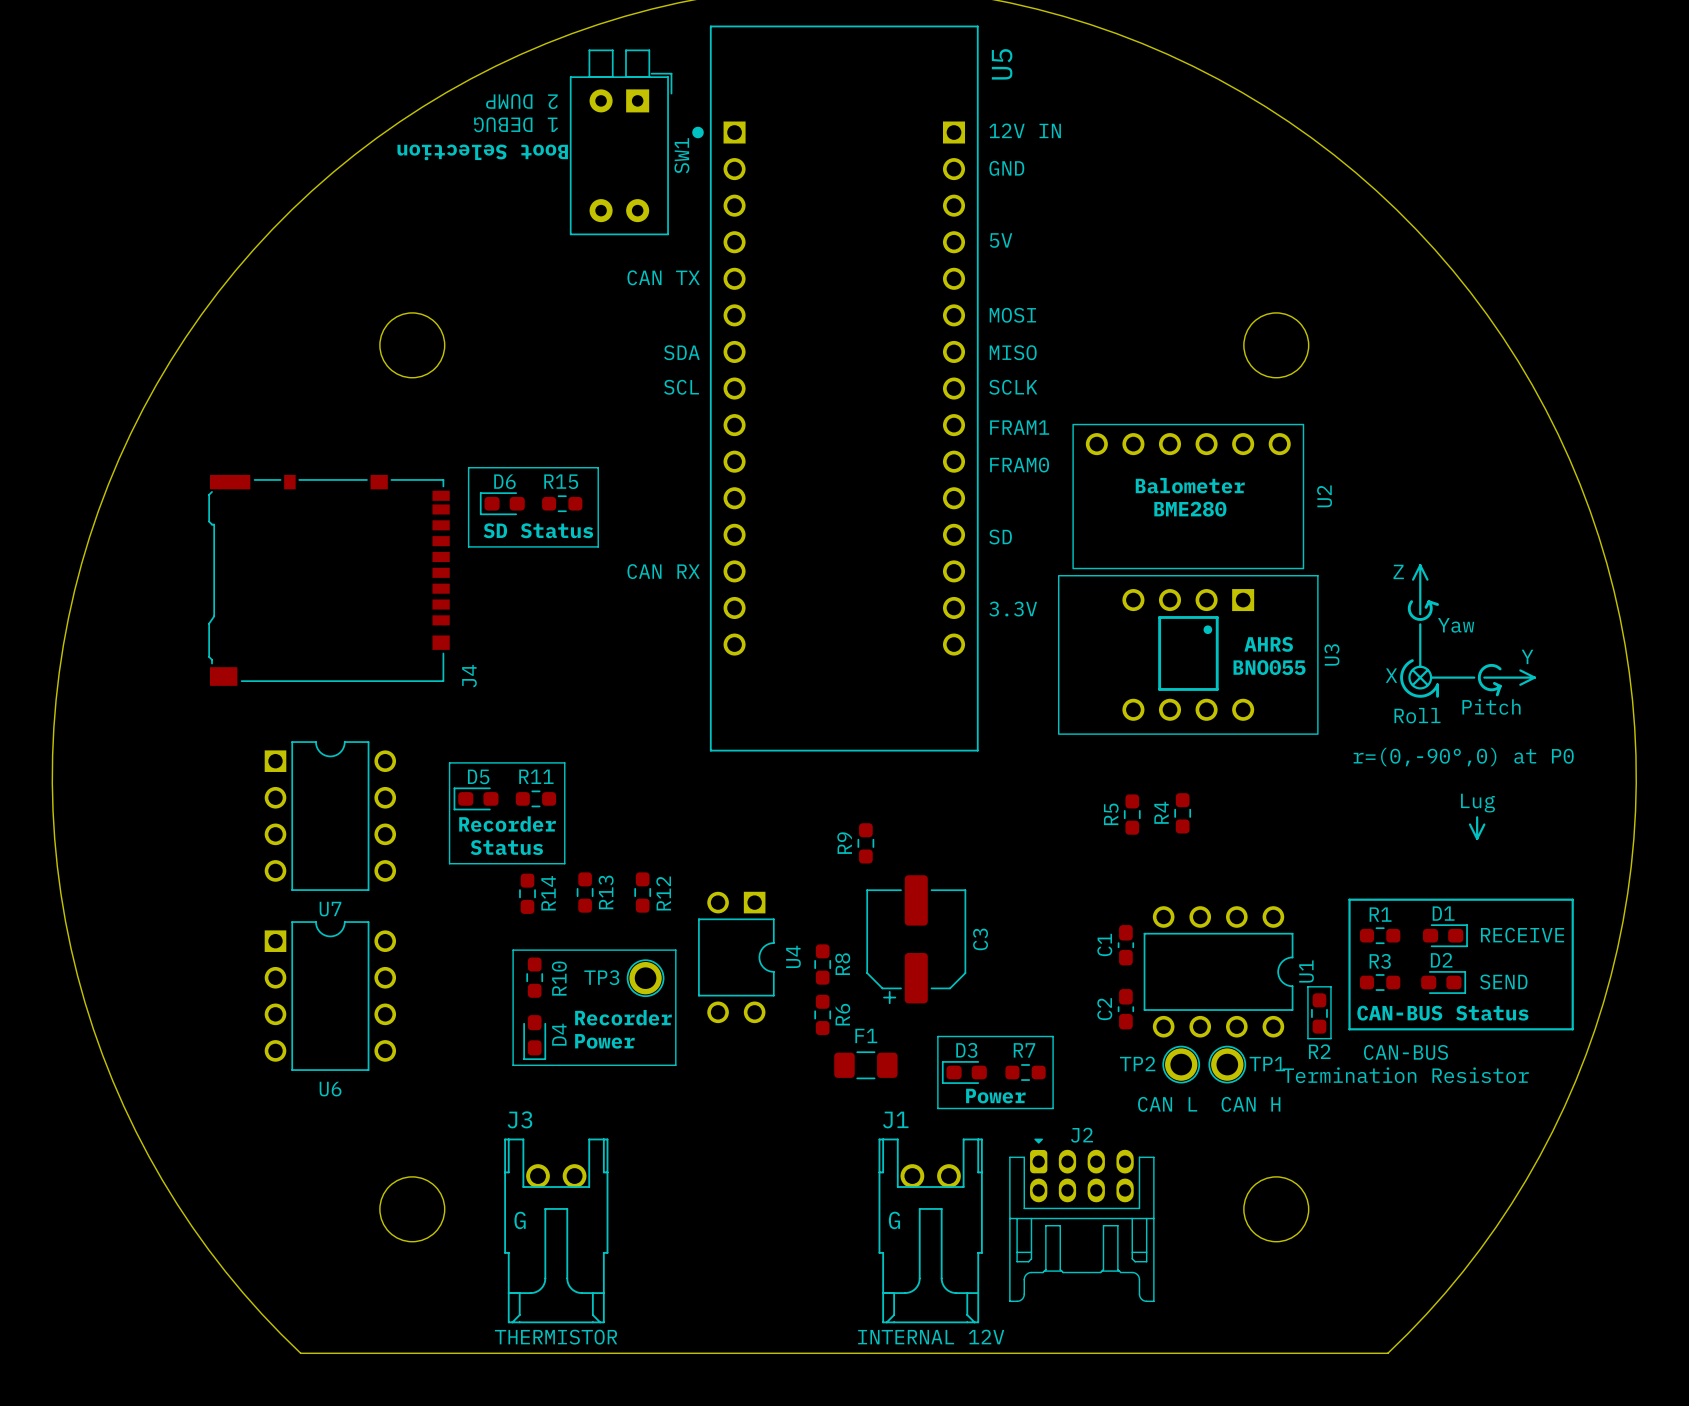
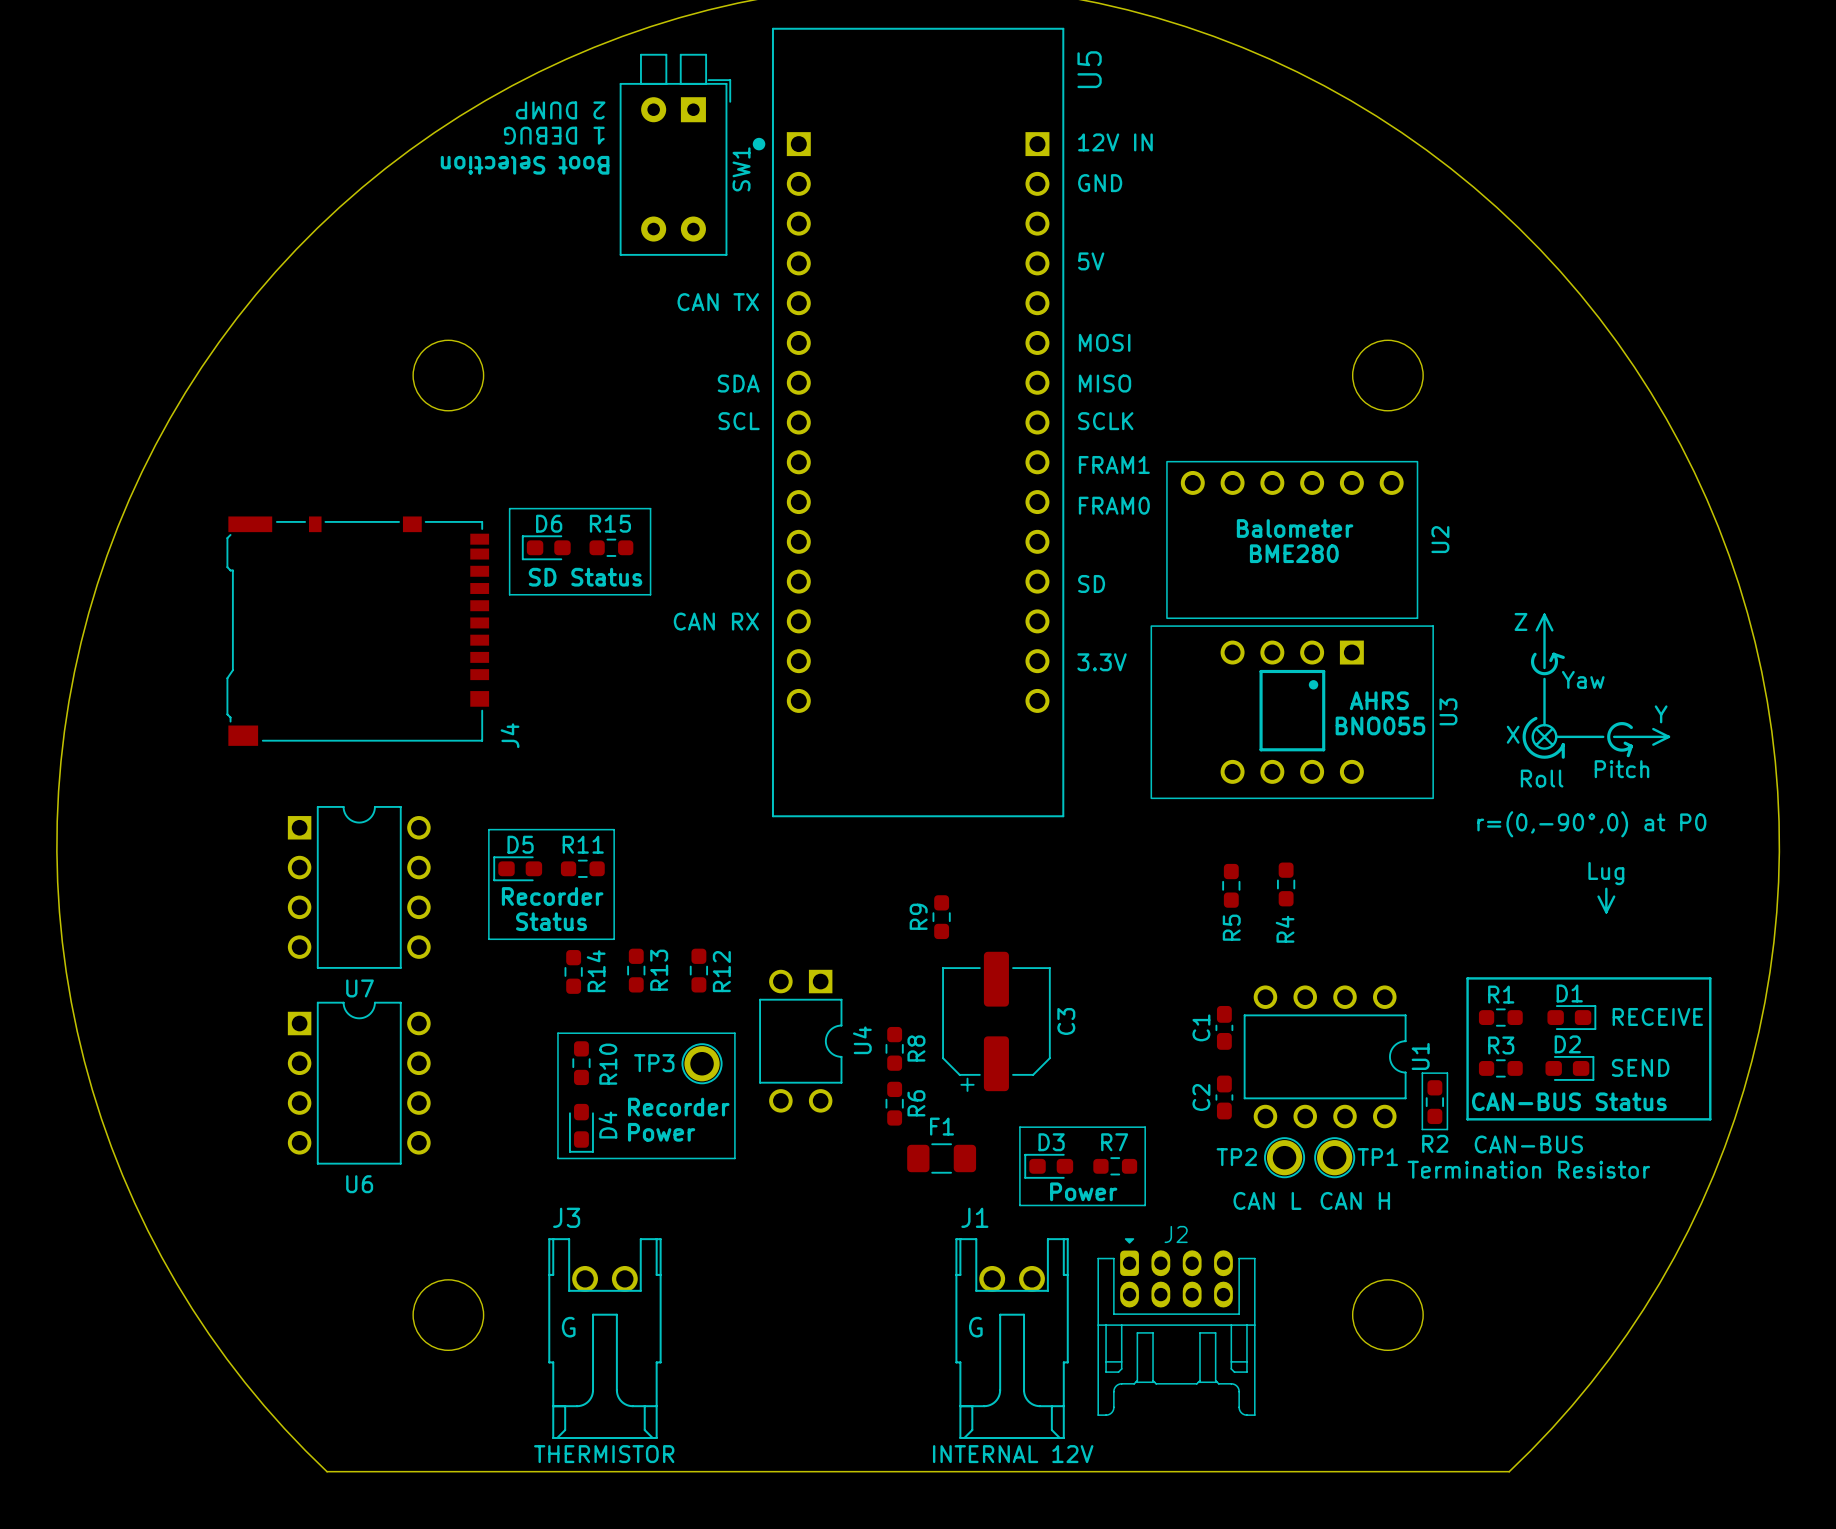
R4 name position: R4 (1161, 812) -> R4 (1285, 929)
R5 name position: R5 (1111, 814) -> R5 (1231, 927)

